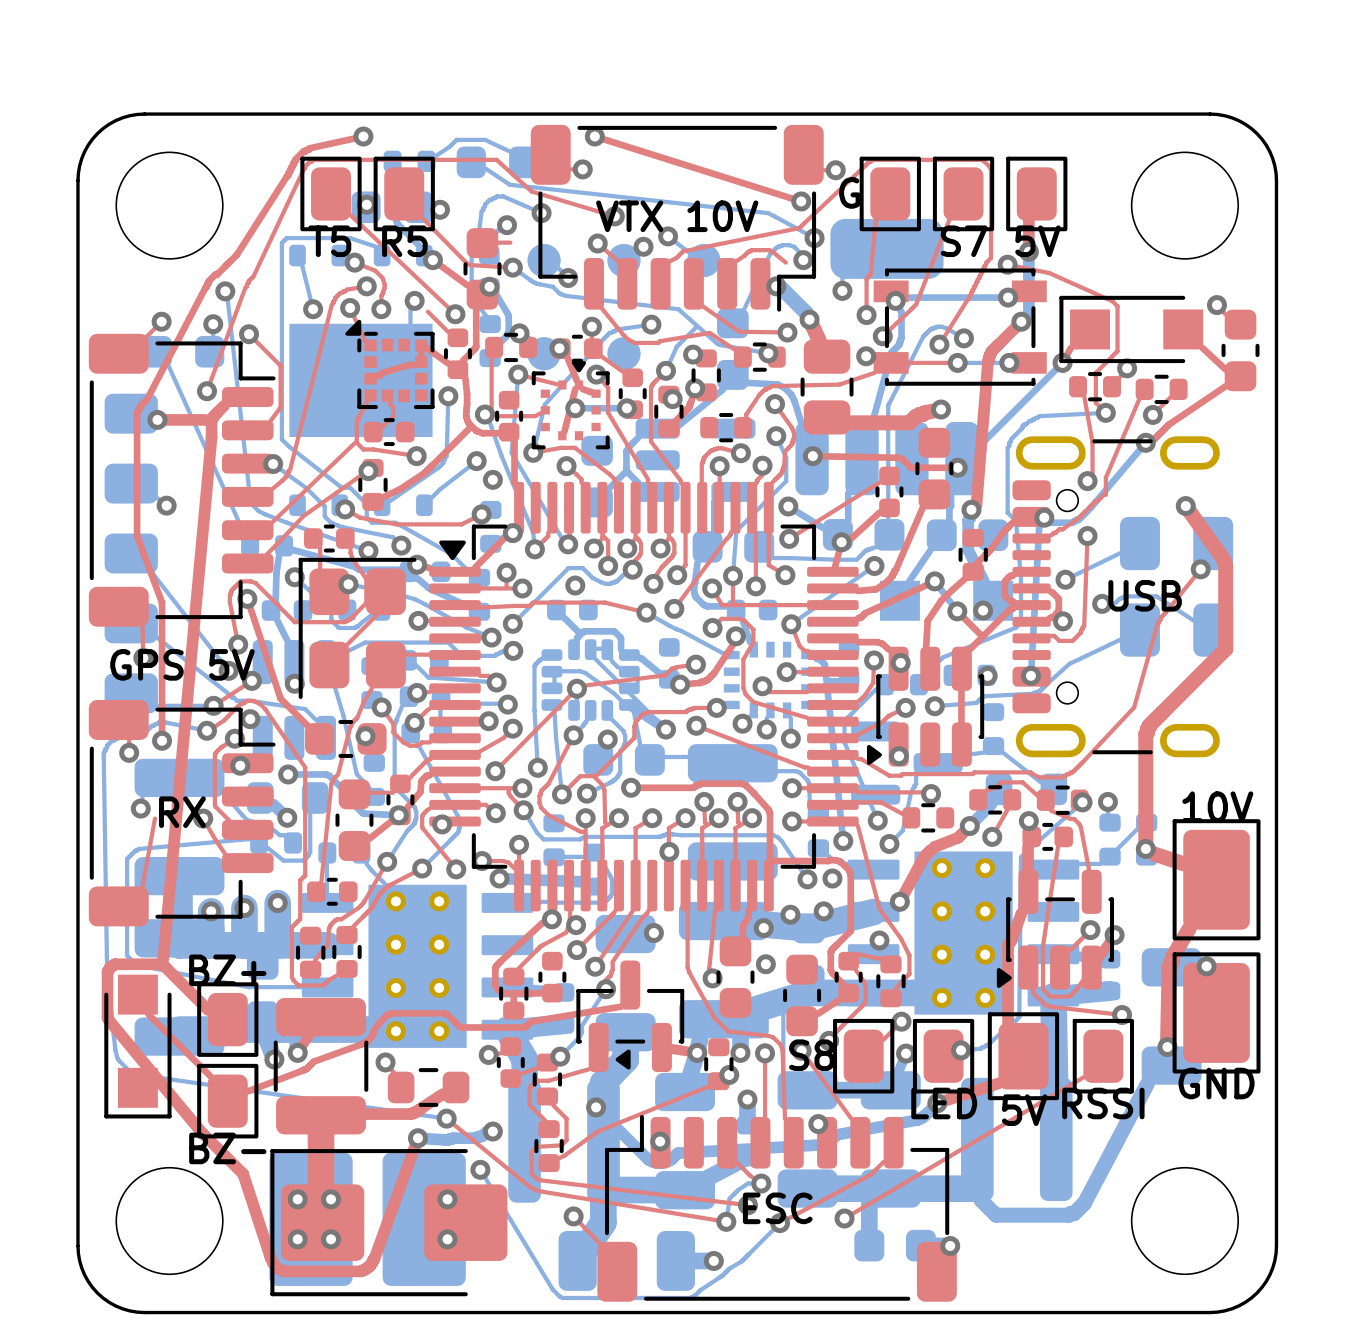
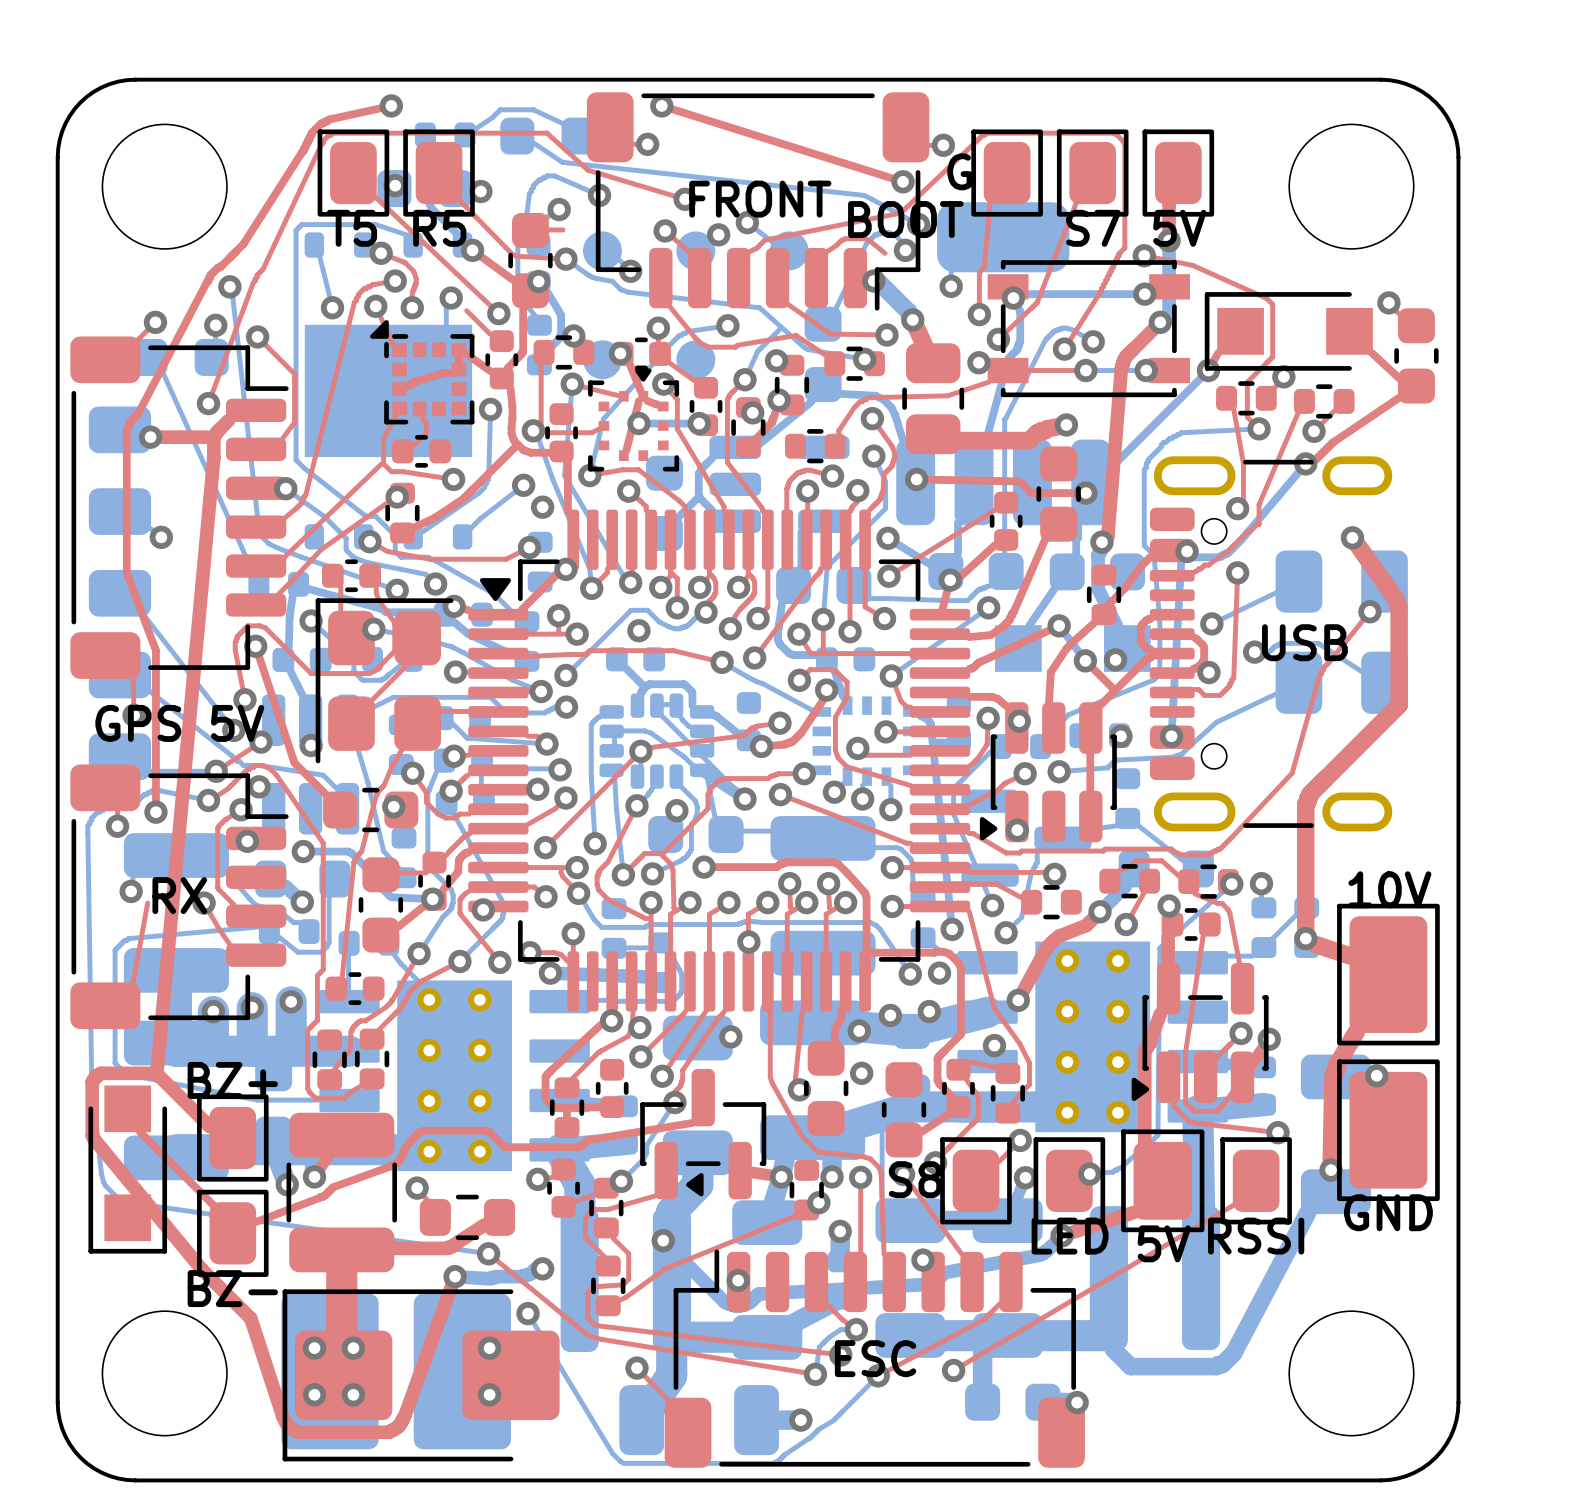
text: VTX 10V (677, 216) -> FRONT (760, 199)
text: none -> BOOT (905, 219)

